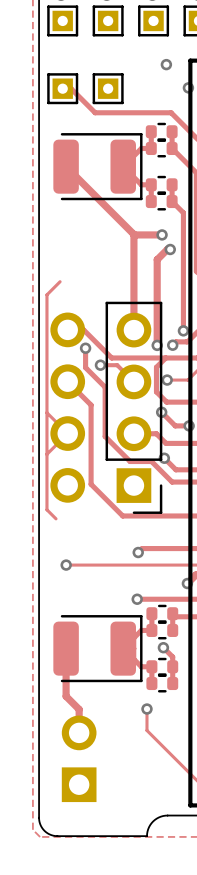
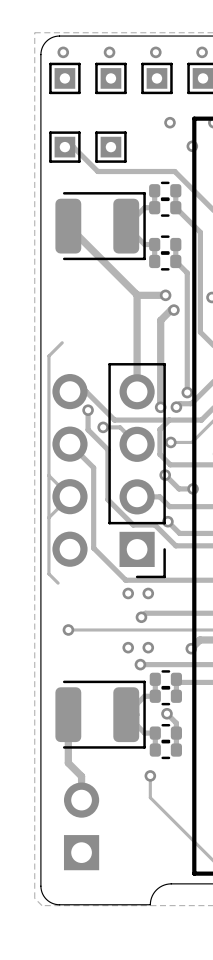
via: none -> (128, 593)
via: none -> (148, 593)
via: none -> (128, 647)
via: none -> (148, 647)

